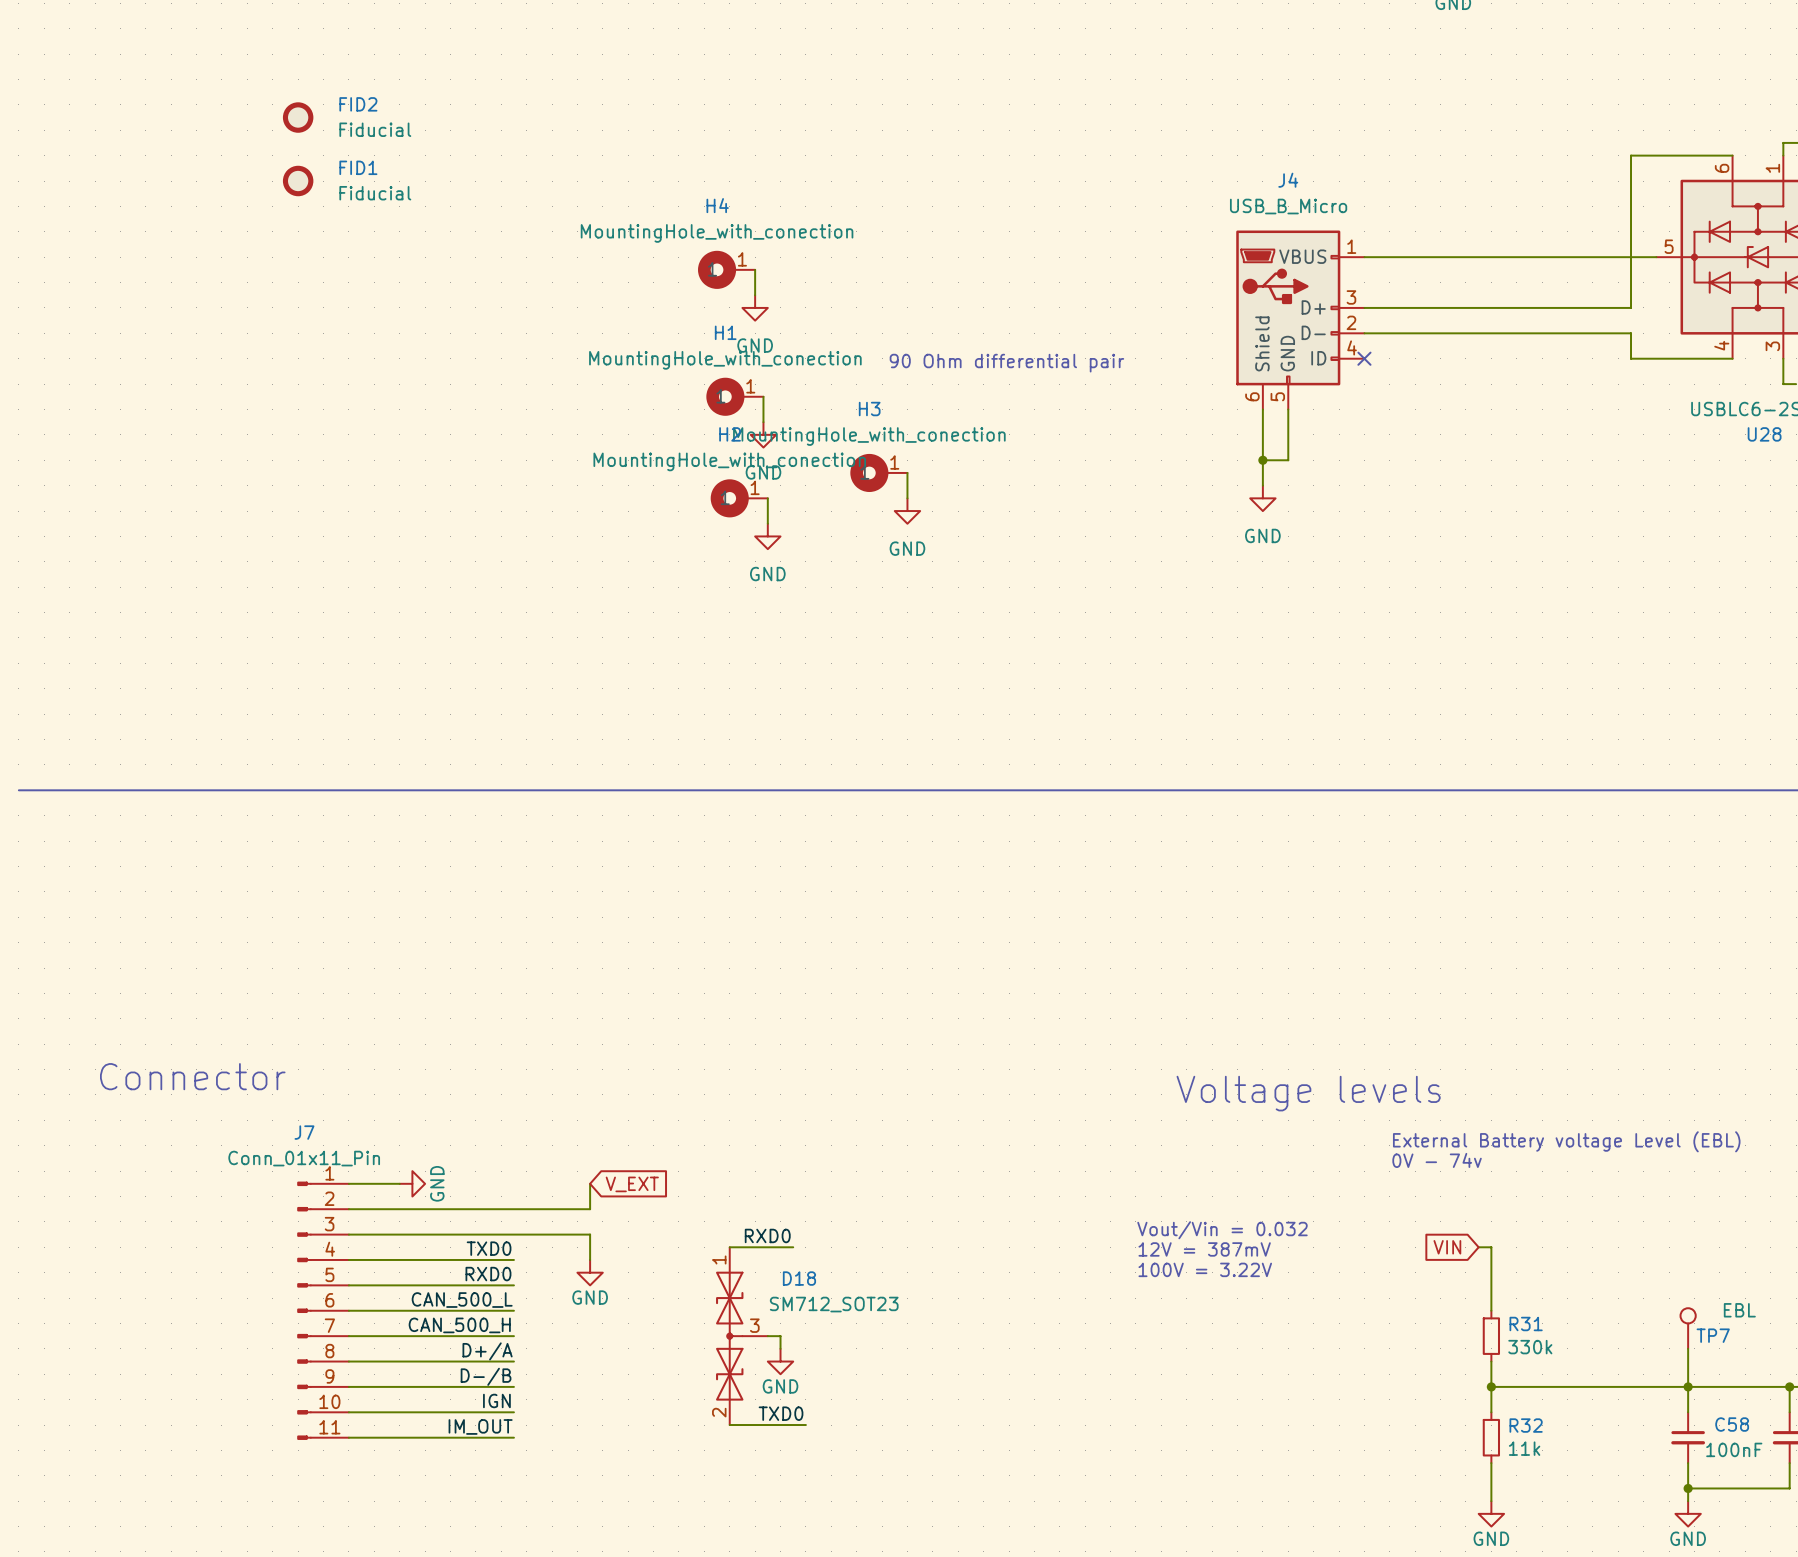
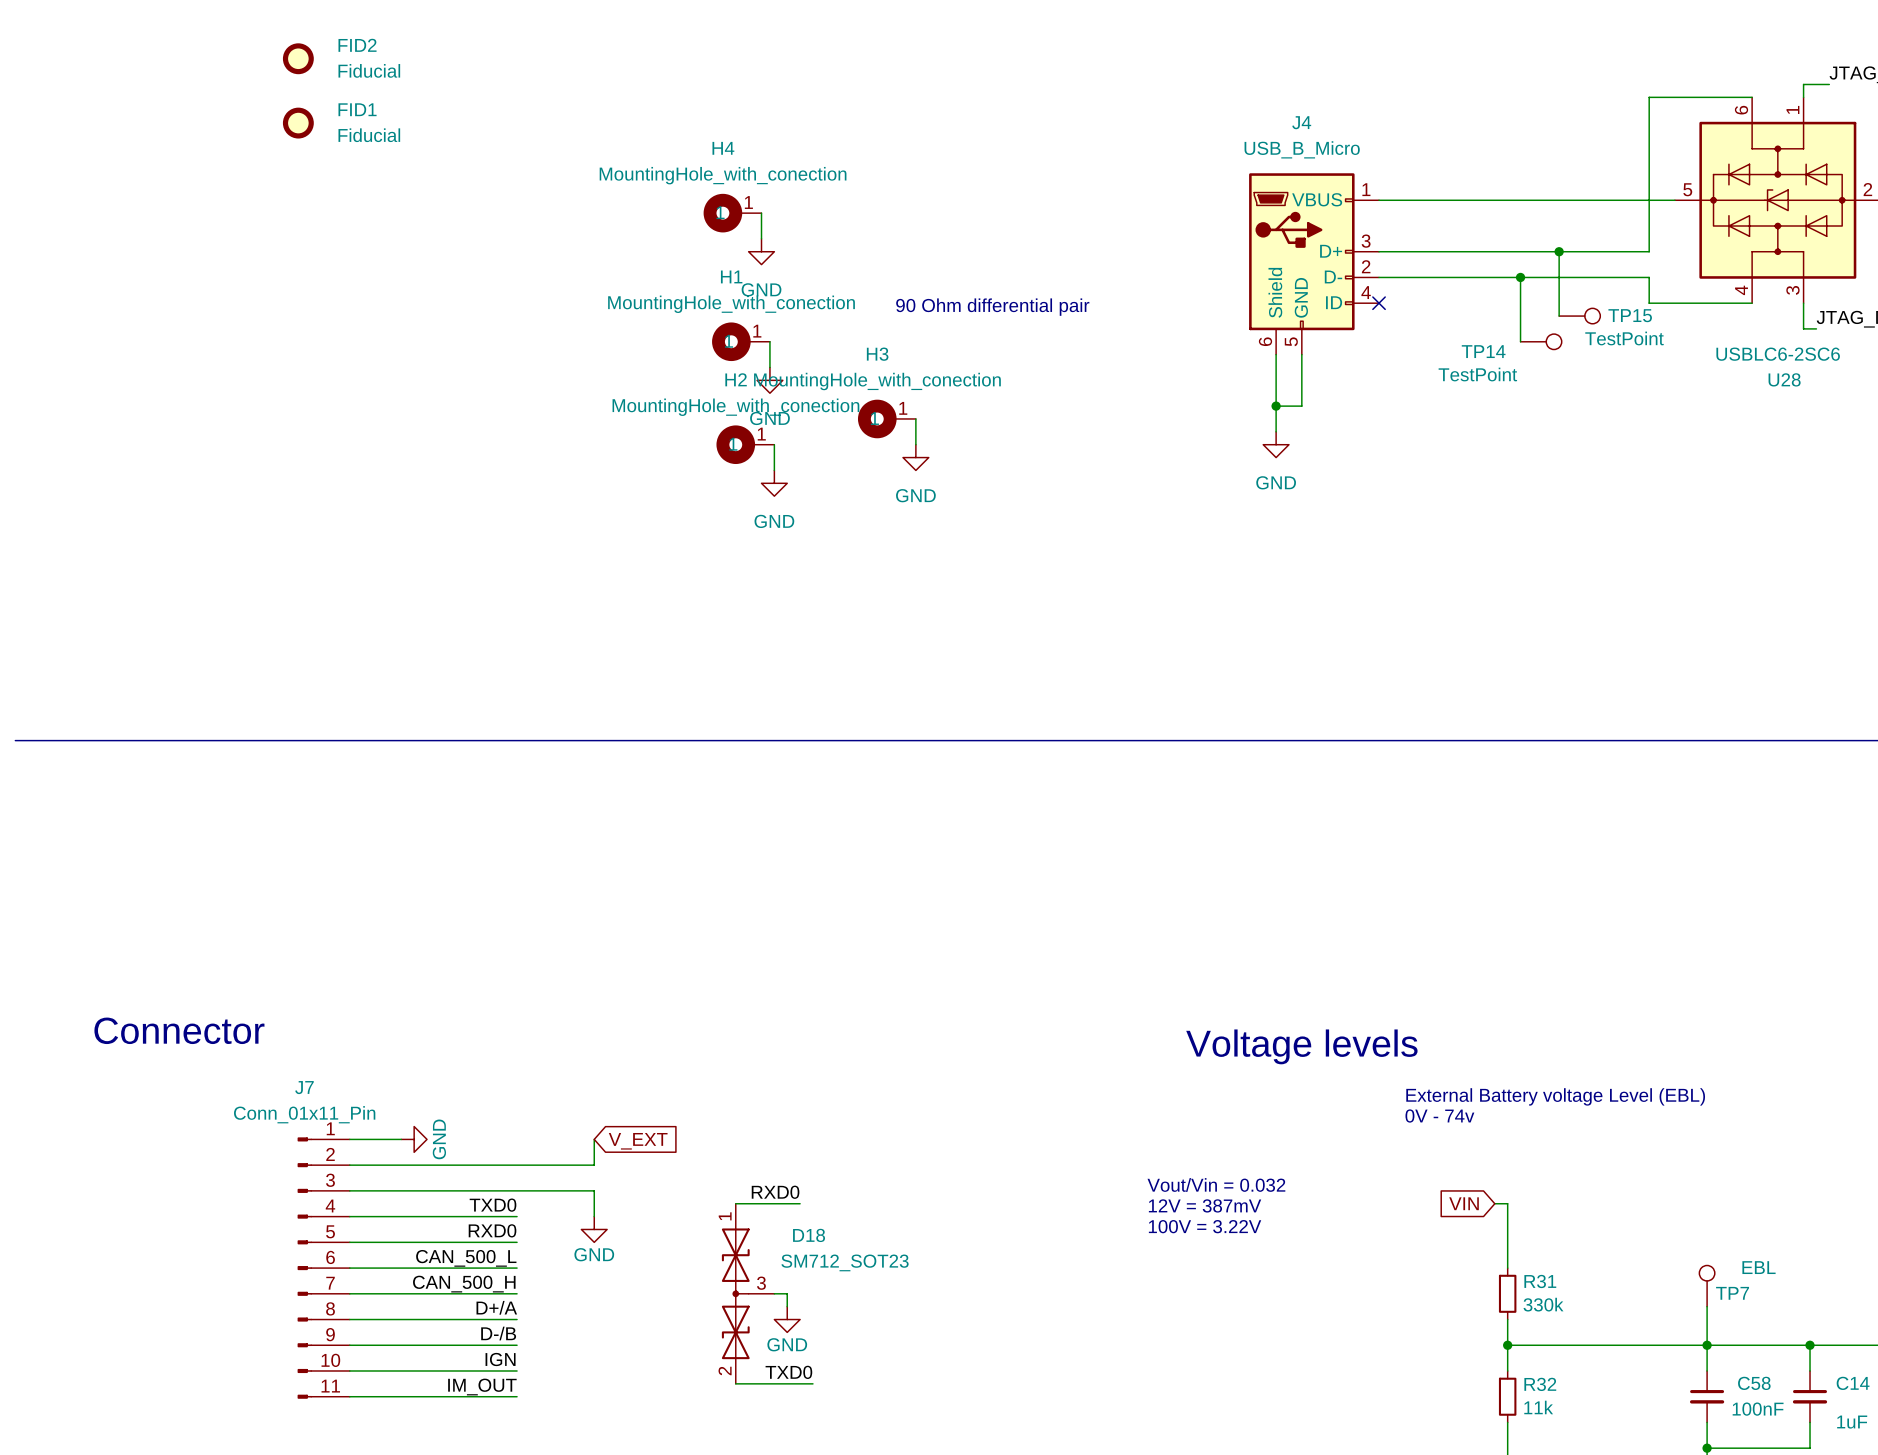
wire: none -> (1559, 251) (1559, 316)
junction: none -> (1559, 251)
wire: none -> (1520, 277) (1520, 341)
junction: none -> (1520, 277)
TP15: none -> TestPoint (1579, 316)
TP14: none -> TestPoint (1541, 341)

